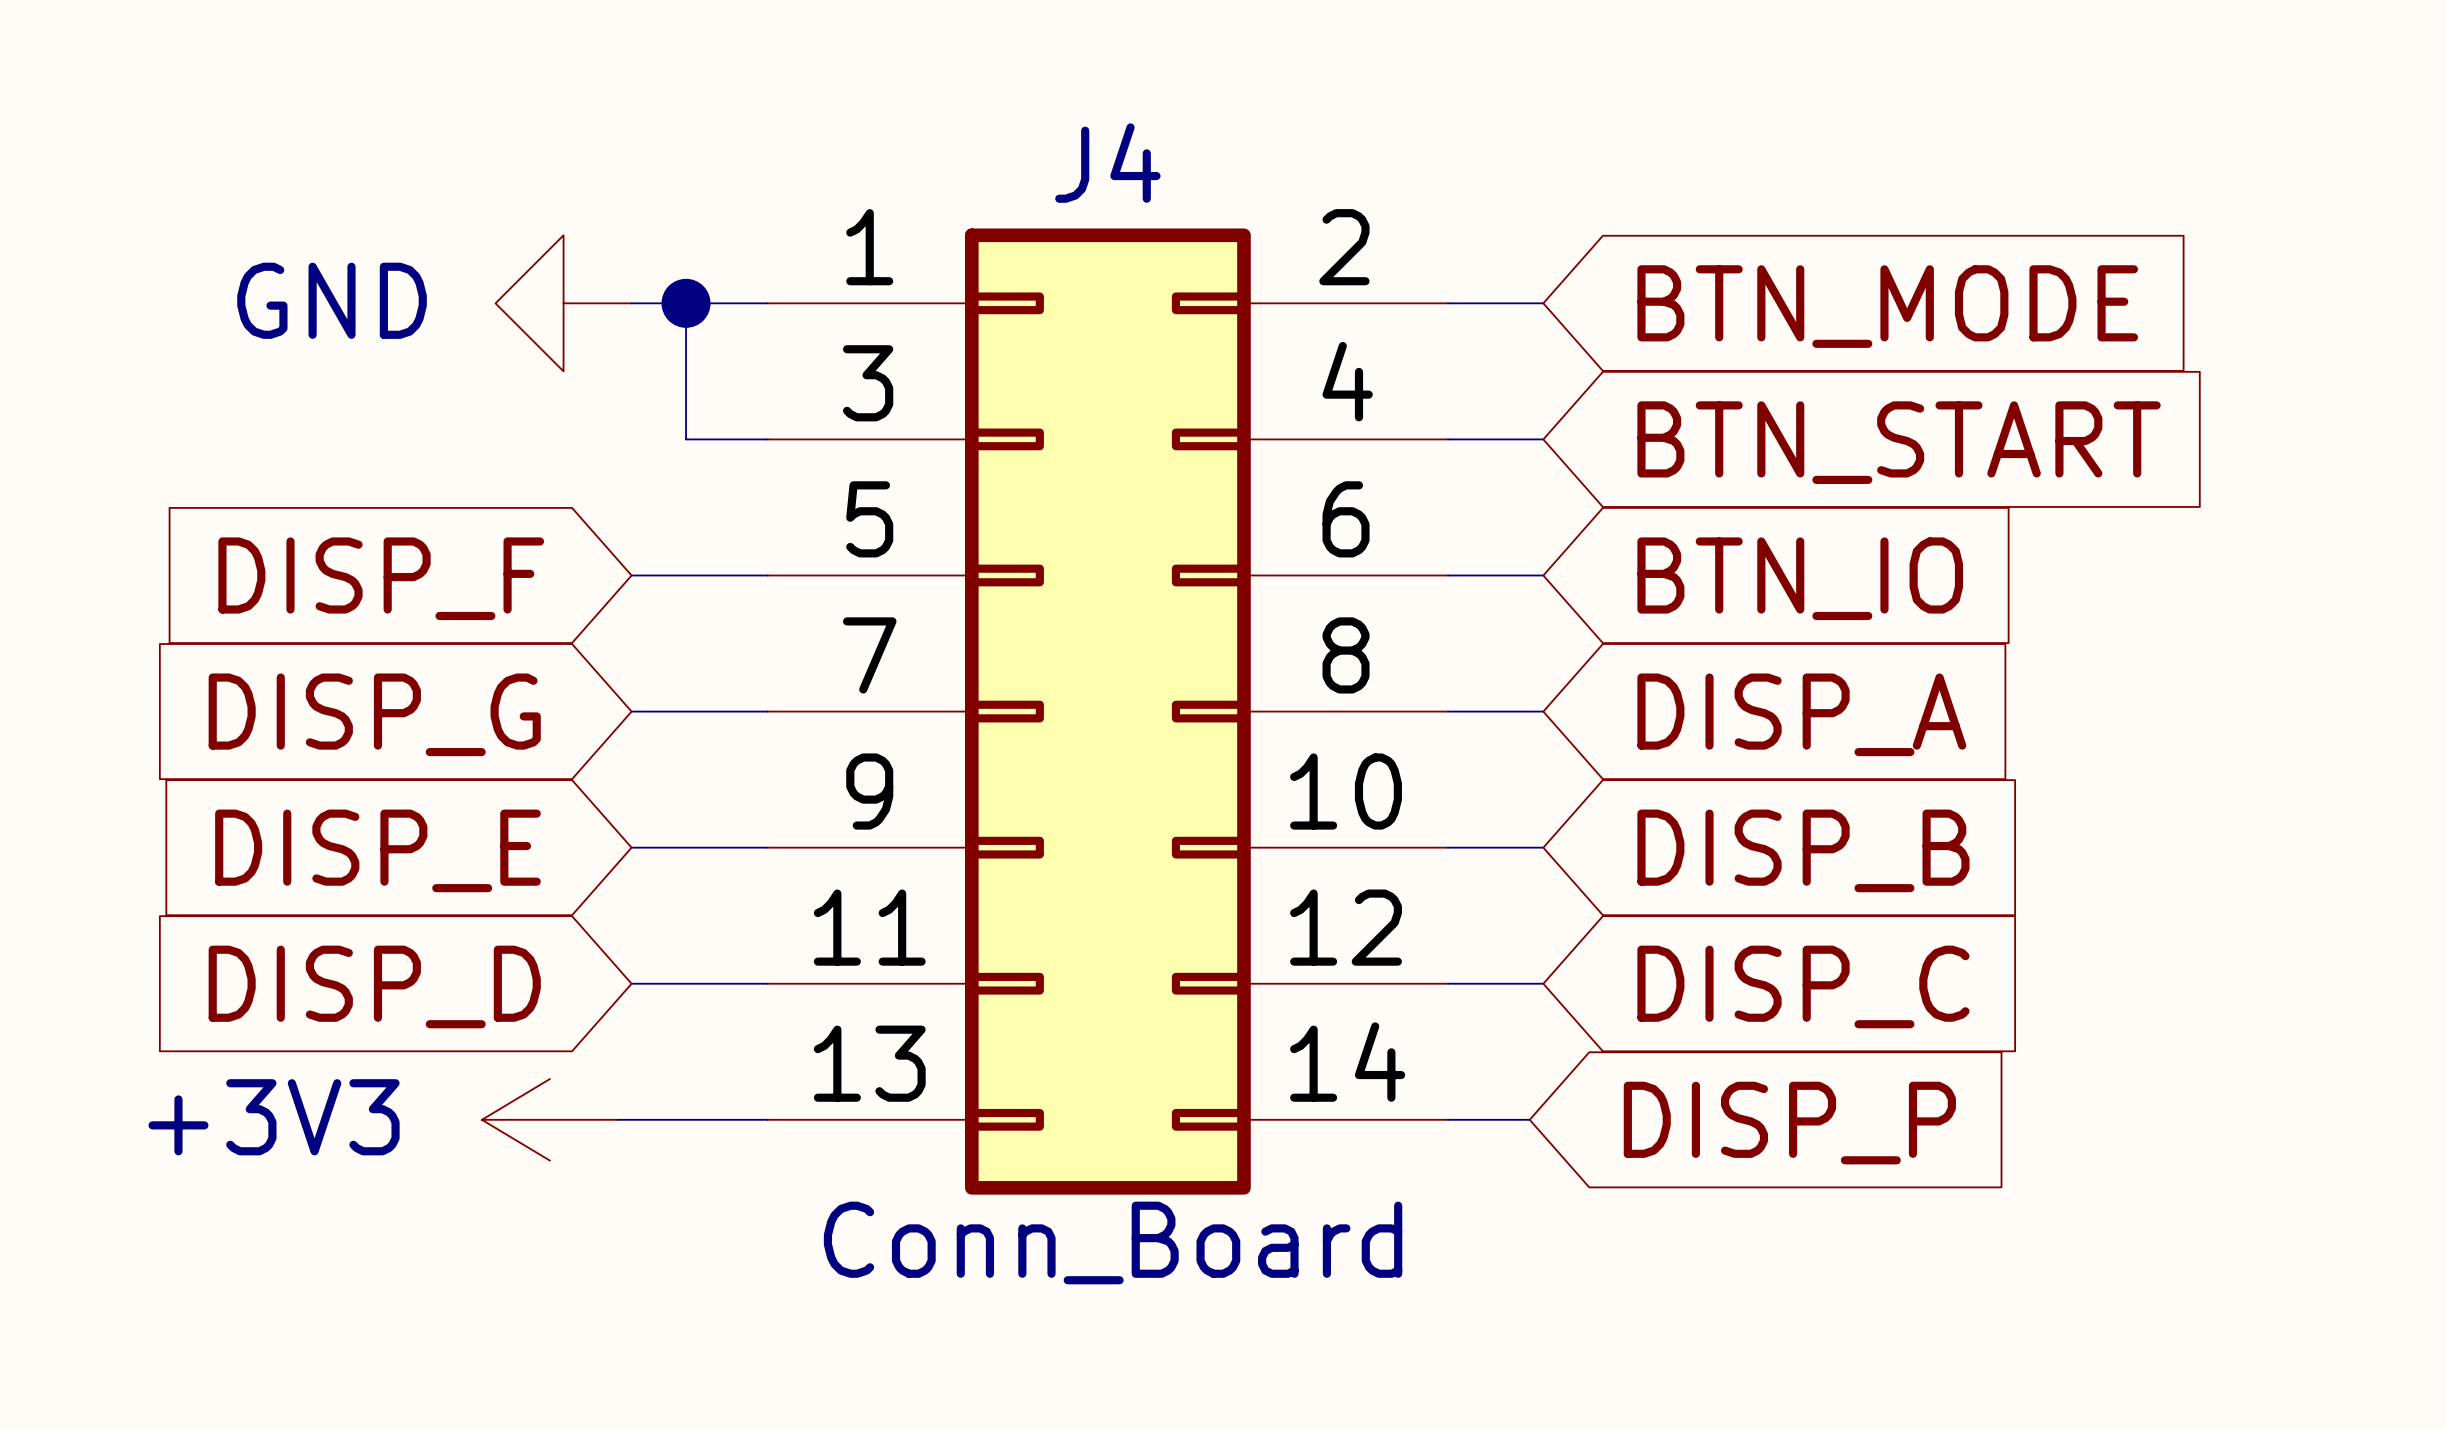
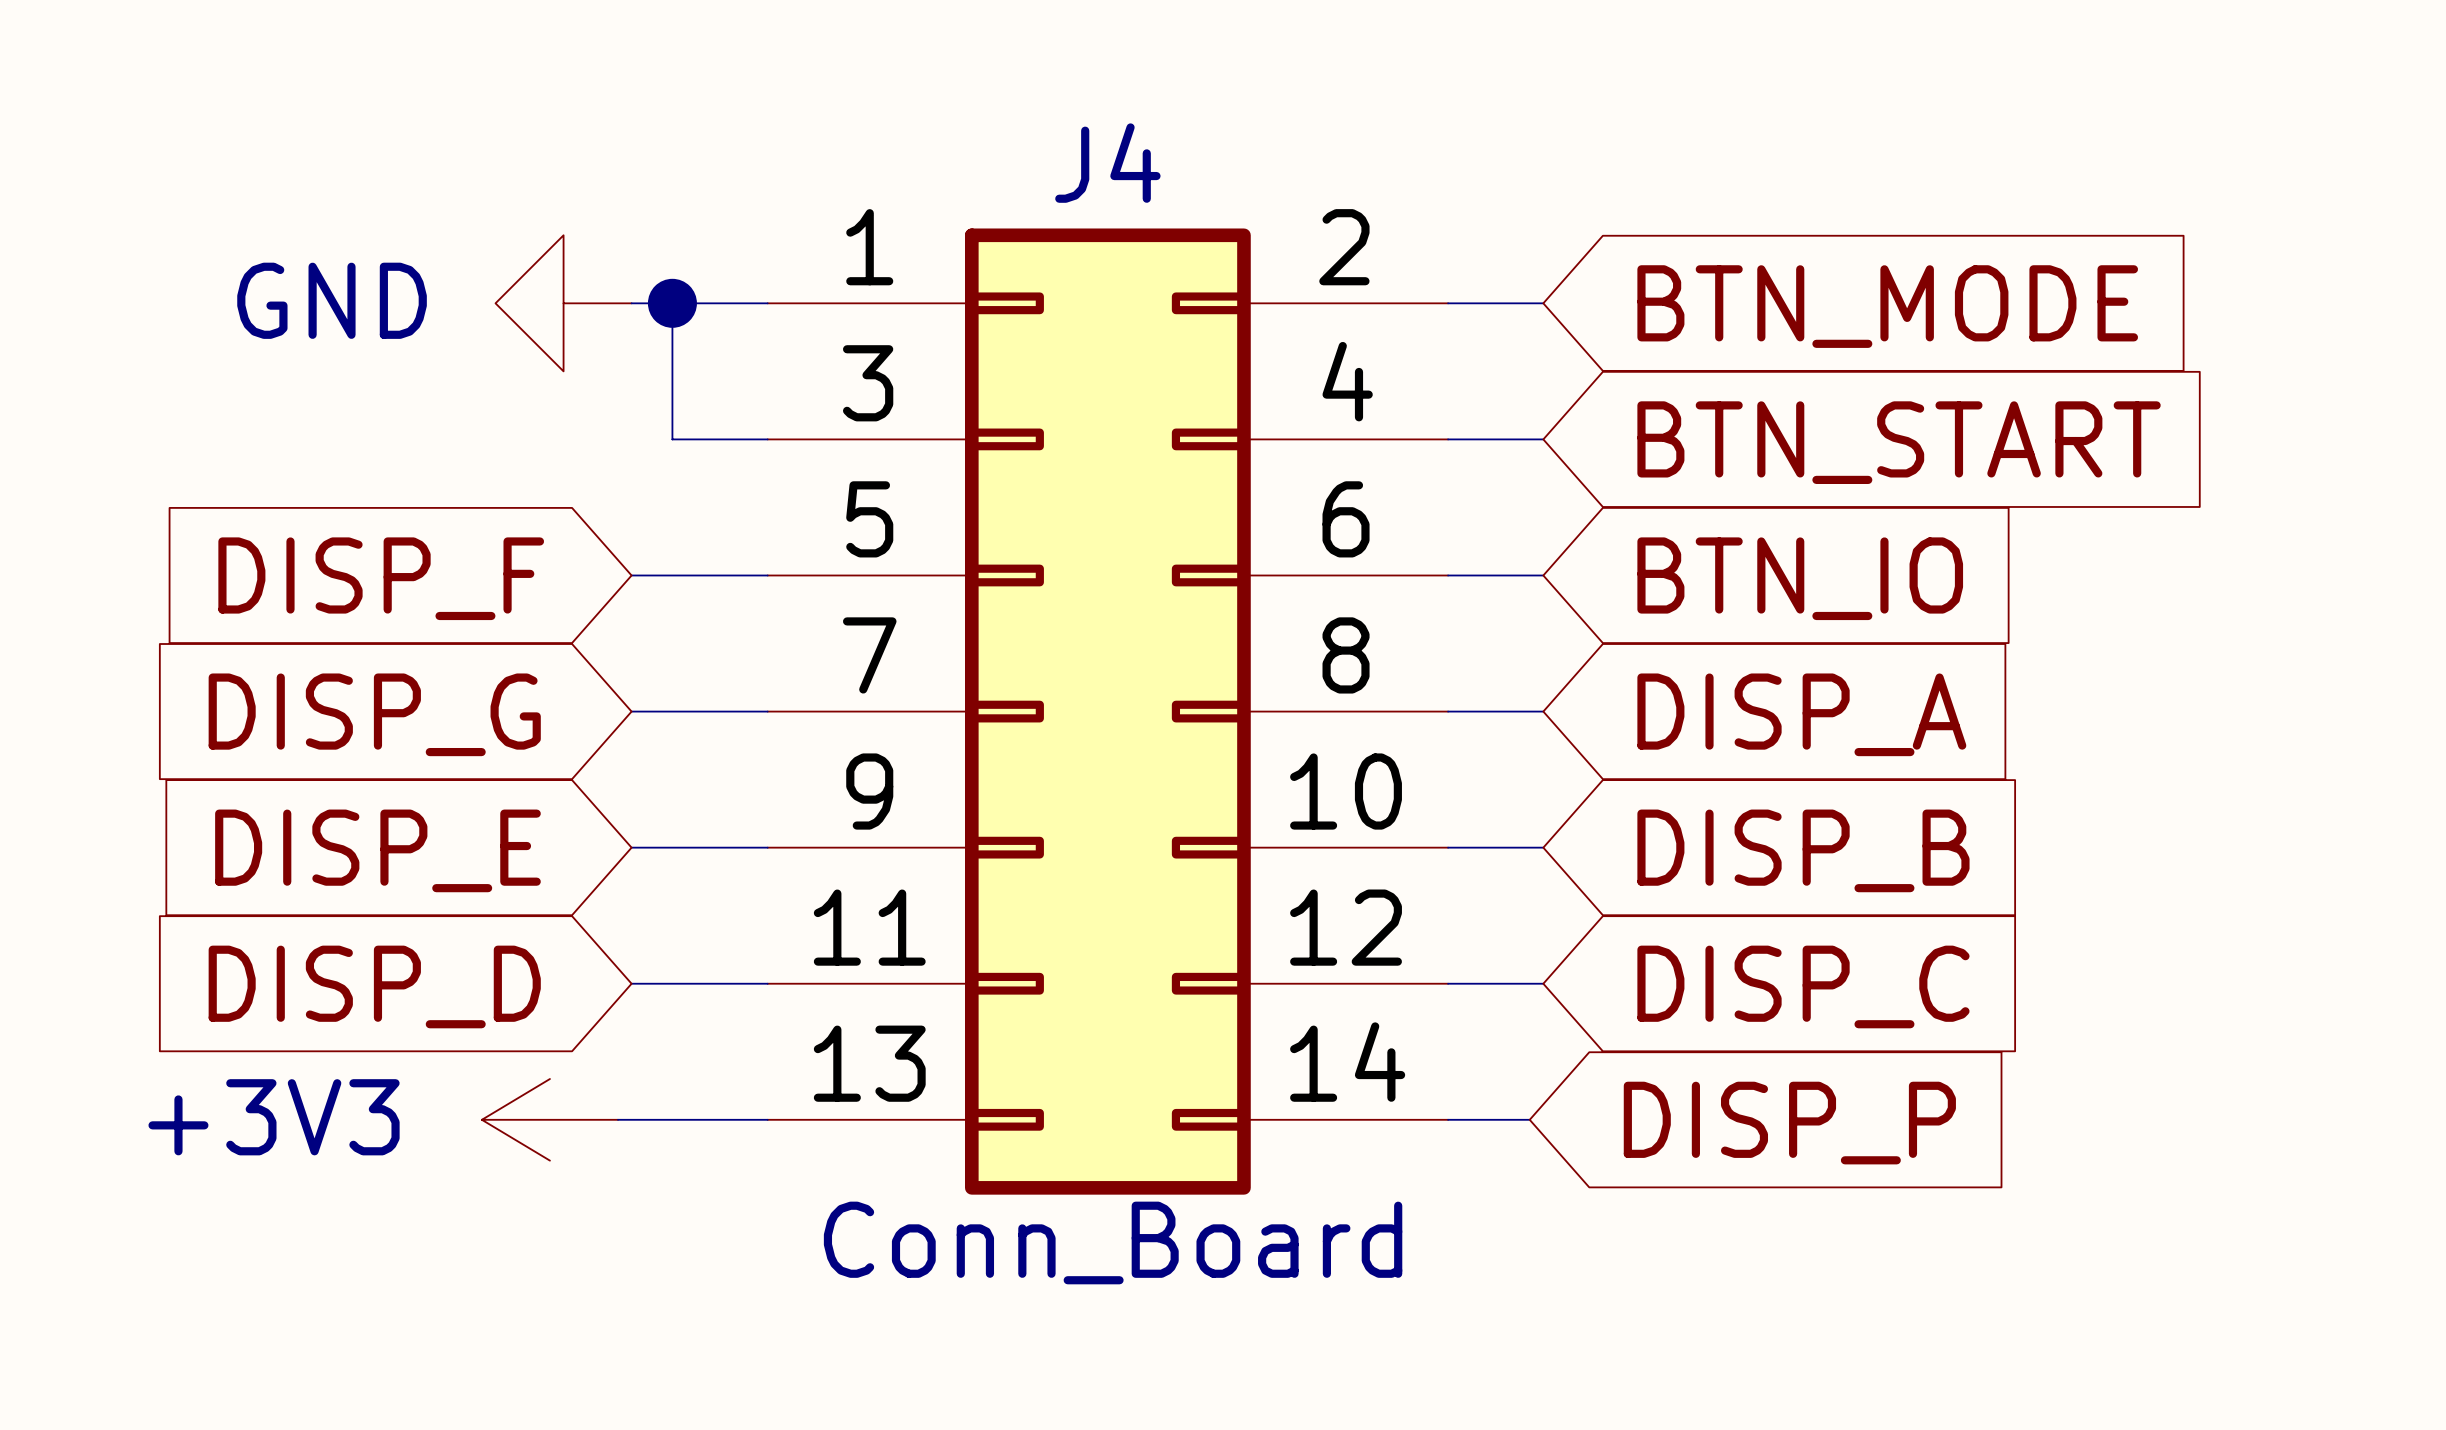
wire: (686, 303) (686, 439) -> (672, 303) (672, 439) (686, 439)
junction position: (686, 303) -> (672, 303)

